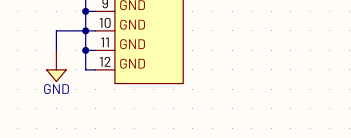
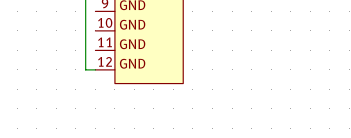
wire: (85, 11) (95, 11) -> none
junction: (85, 11) -> none
junction: (85, 30) -> none
wire: (95, 30) (56, 30) (56, 50) -> none
wire: (85, 50) (95, 50) -> none
junction: (85, 50) -> none
power symbol: GND (56, 66) -> none

